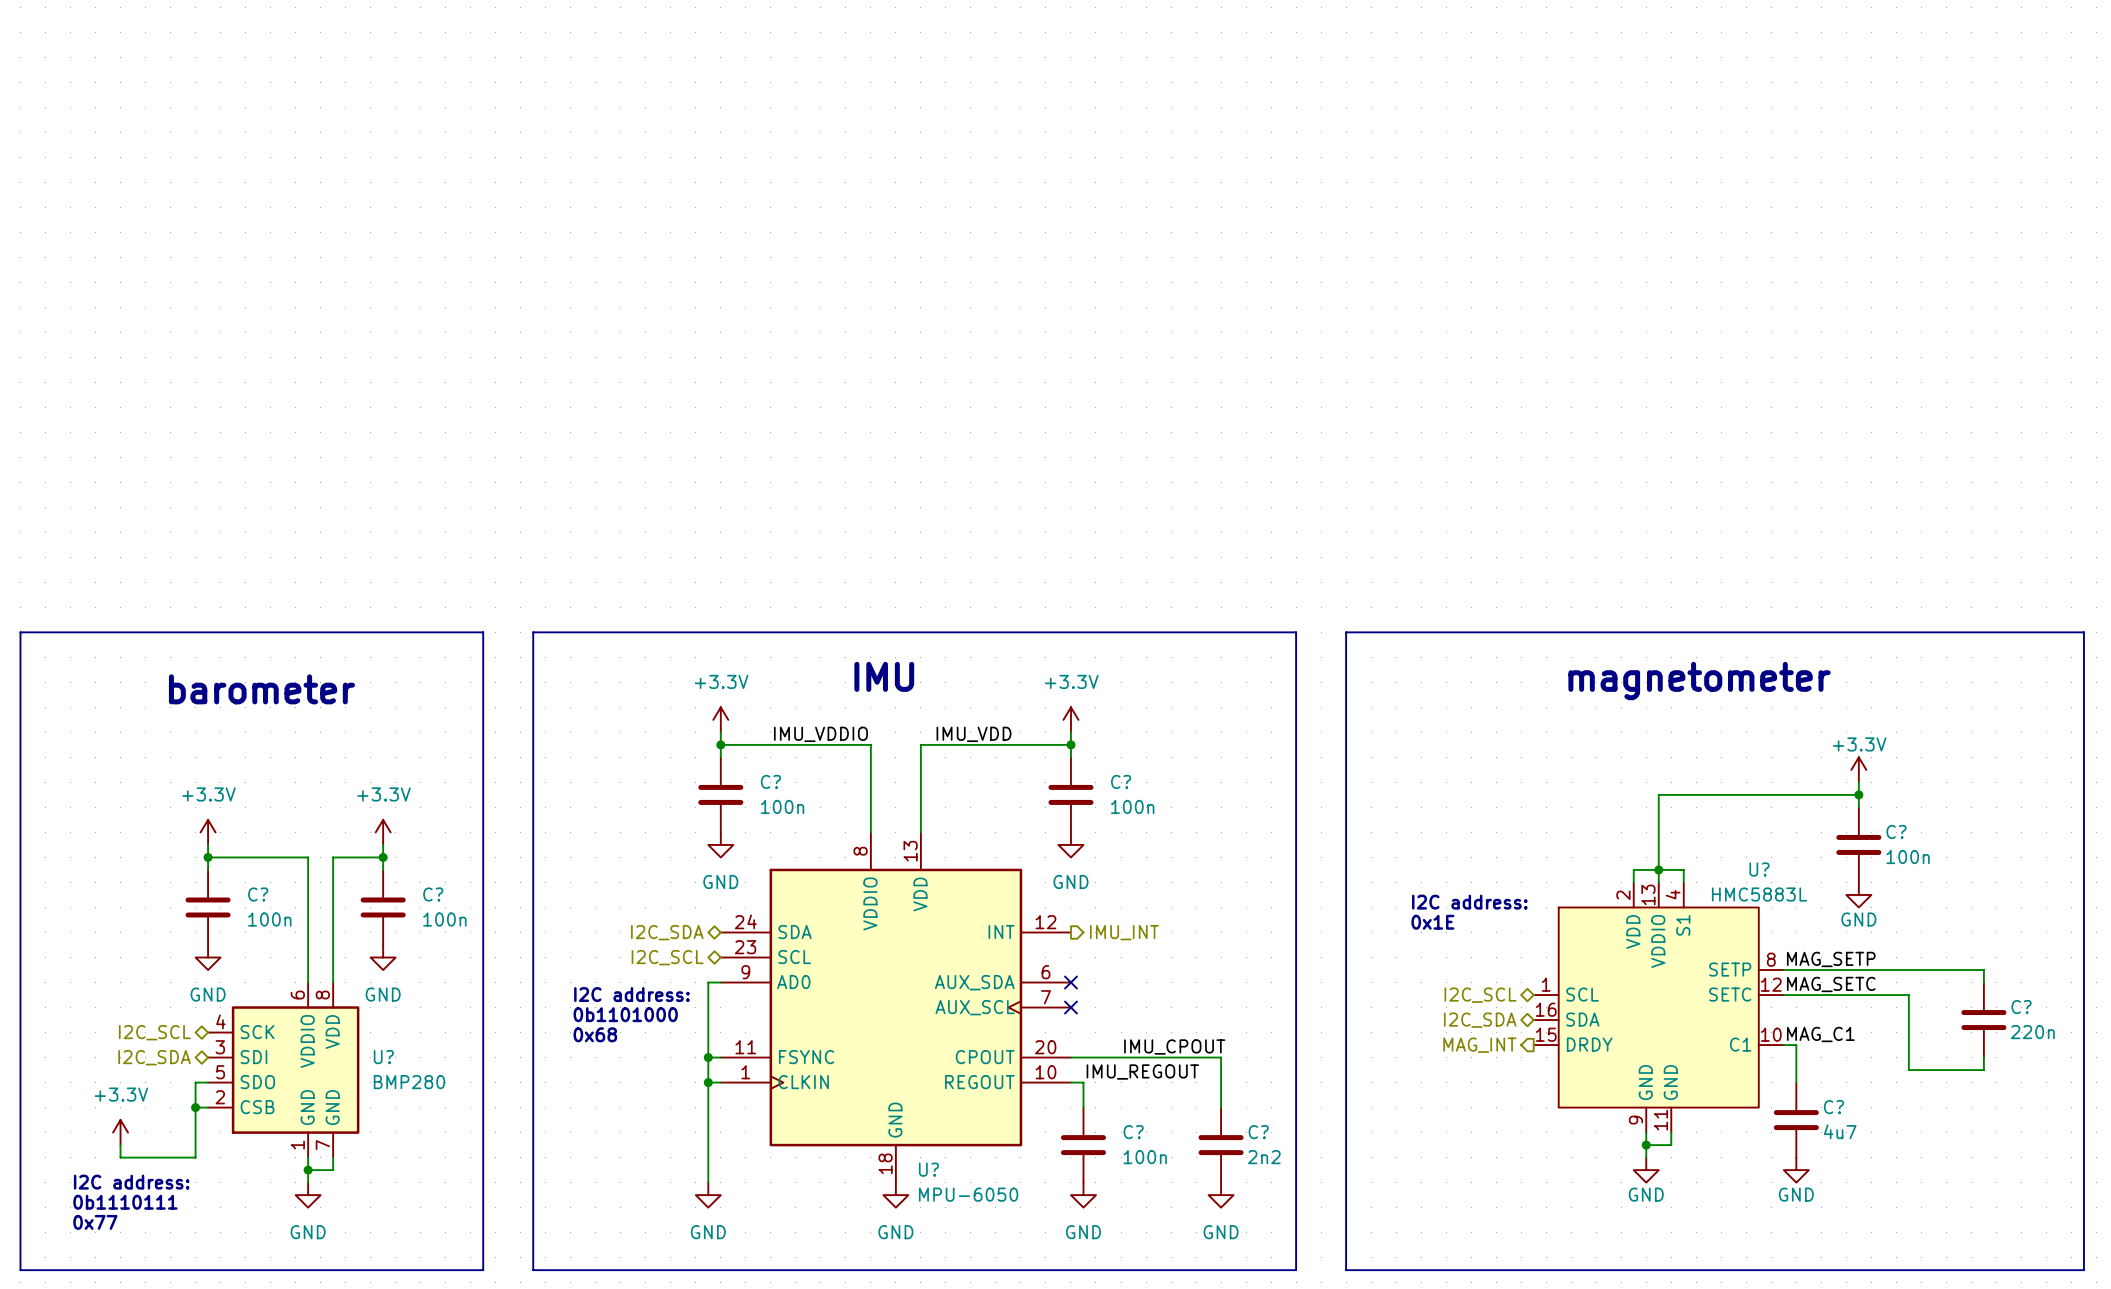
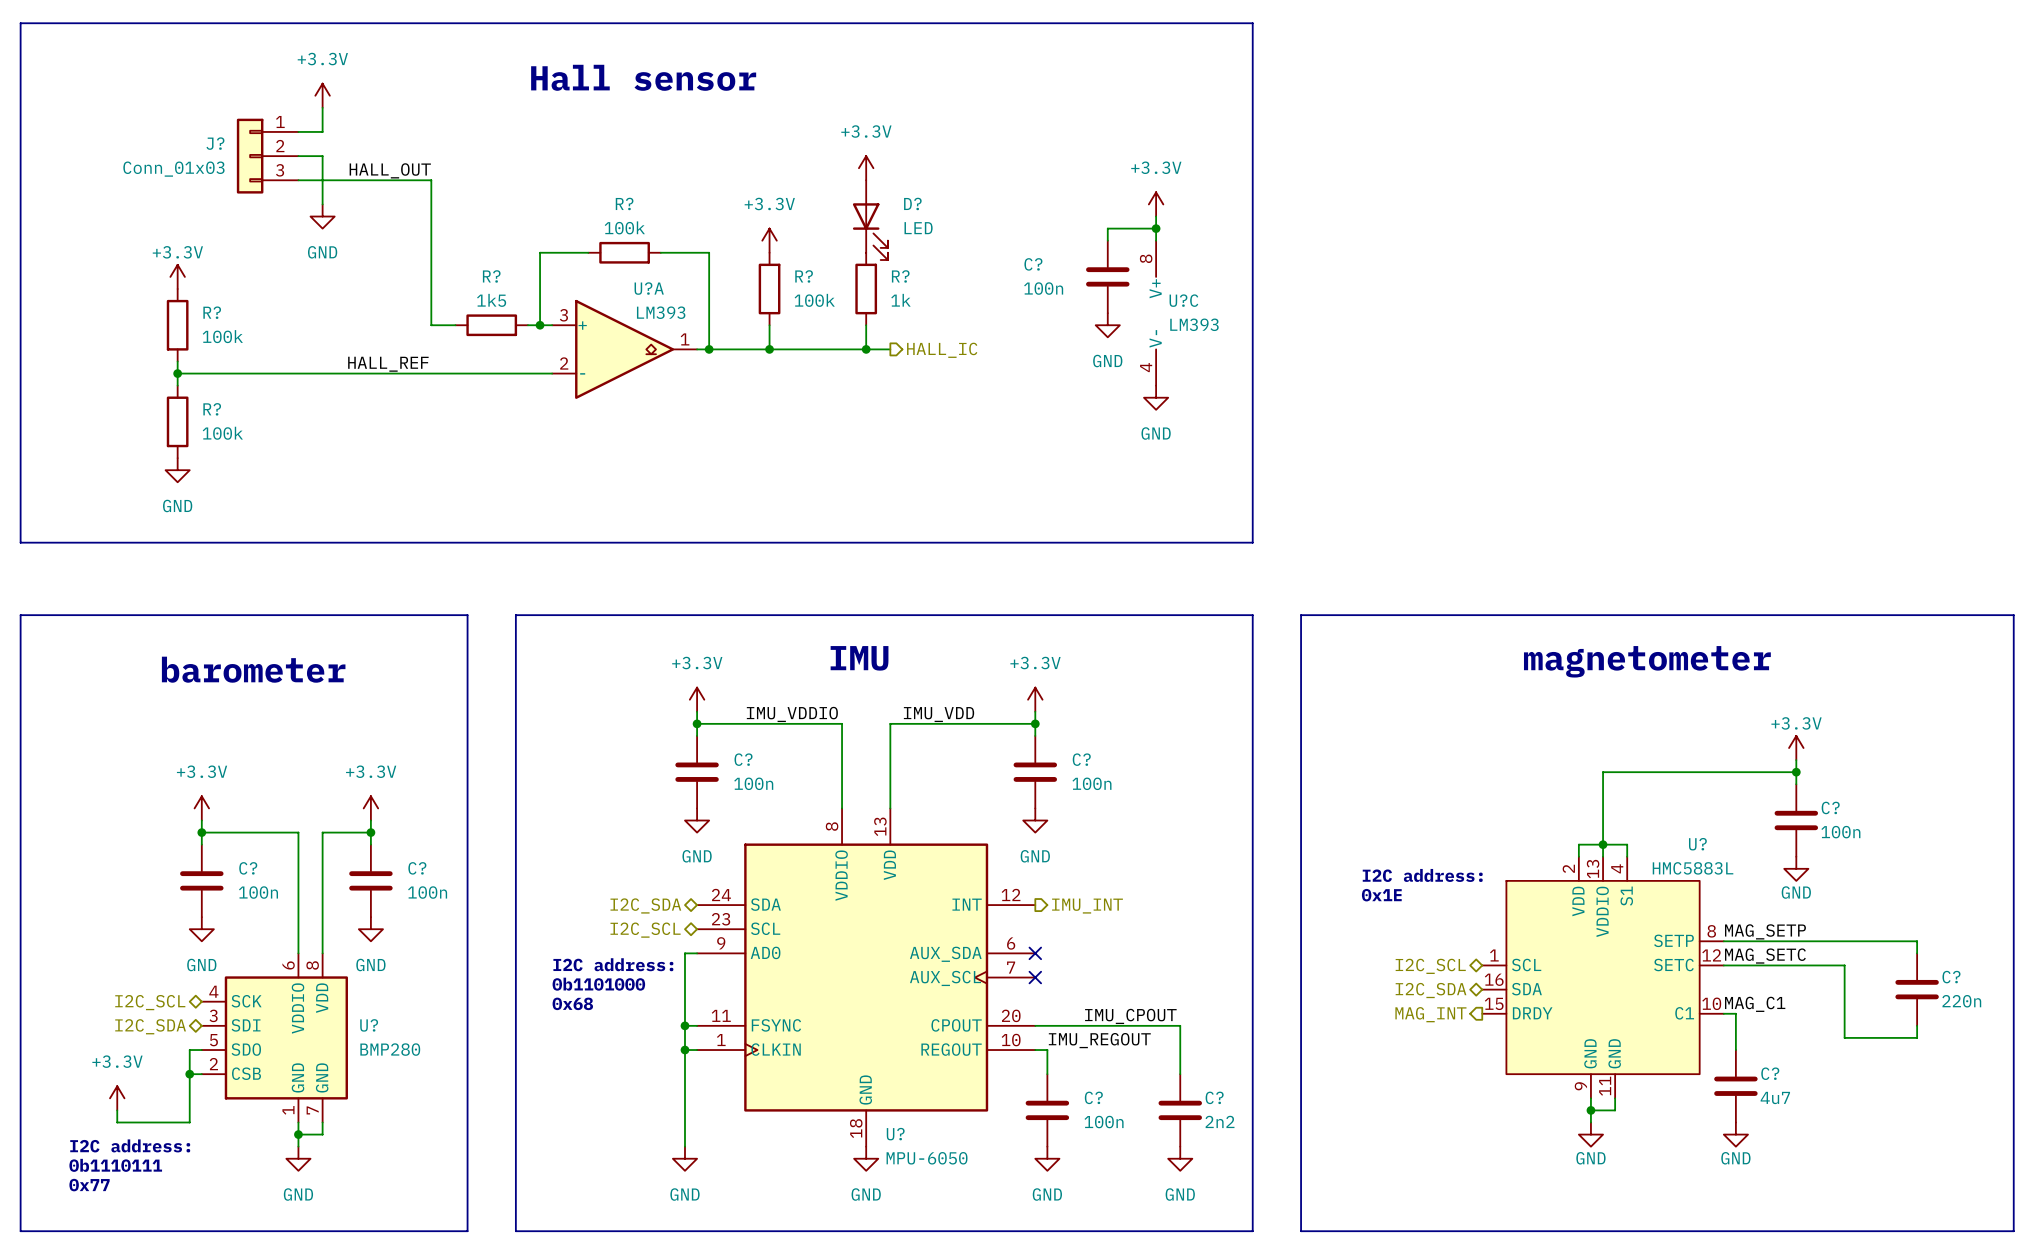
line: none -> (20, 23) (20, 542) (1252, 542) (1252, 23) (20, 23)
text: none -> Hall sensor (643, 77)
power symbol: none -> +3.3V (322, 95)
wire: none -> (322, 107) (322, 131) (298, 131)
J?: none -> Conn_01x03 (267, 156)
wire: none -> (298, 156) (322, 156) (322, 204)
power symbol: none -> +3.3V (866, 168)
label: none -> HALL_OUT (390, 170)
wire: none -> (298, 180) (431, 180) (431, 325) (455, 325)
power symbol: none -> +3.3V (1156, 204)
power symbol: none -> GND (322, 216)
wire: none -> (1156, 216) (1156, 240)
D?: none -> LED (870, 220)
wire: none -> (1156, 228) (1107, 228) (1107, 240)
junction: none -> (1156, 228)
power symbol: none -> +3.3V (769, 240)
wire: none -> (588, 252) (540, 252) (540, 325)
R?: none -> 100k (624, 252)
wire: none -> (660, 252) (709, 252) (709, 349)
power symbol: none -> +3.3V (177, 276)
C?: none -> 100n (1107, 276)
R?: none -> 100k (769, 289)
R?: none -> 1k (866, 289)
U?C: none -> LM393 (1156, 313)
R?: none -> 100k (177, 325)
R?: none -> 1k5 (491, 325)
wire: none -> (527, 325) (552, 325)
junction: none -> (540, 325)
wire: none -> (769, 325) (769, 349)
wire: none -> (866, 325) (866, 349)
power symbol: none -> GND (1107, 325)
U?A: none -> LM393 (624, 349)
wire: none -> (697, 349) (890, 349)
junction: none -> (709, 349)
junction: none -> (769, 349)
junction: none -> (866, 349)
hierarchical label: none -> HALL_IC (942, 350)
wire: none -> (177, 361) (177, 385)
label: none -> HALL_REF (388, 364)
wire: none -> (177, 373) (552, 373)
junction: none -> (177, 373)
power symbol: none -> GND (1156, 397)
R?: none -> 100k (177, 421)
power symbol: none -> GND (177, 470)

